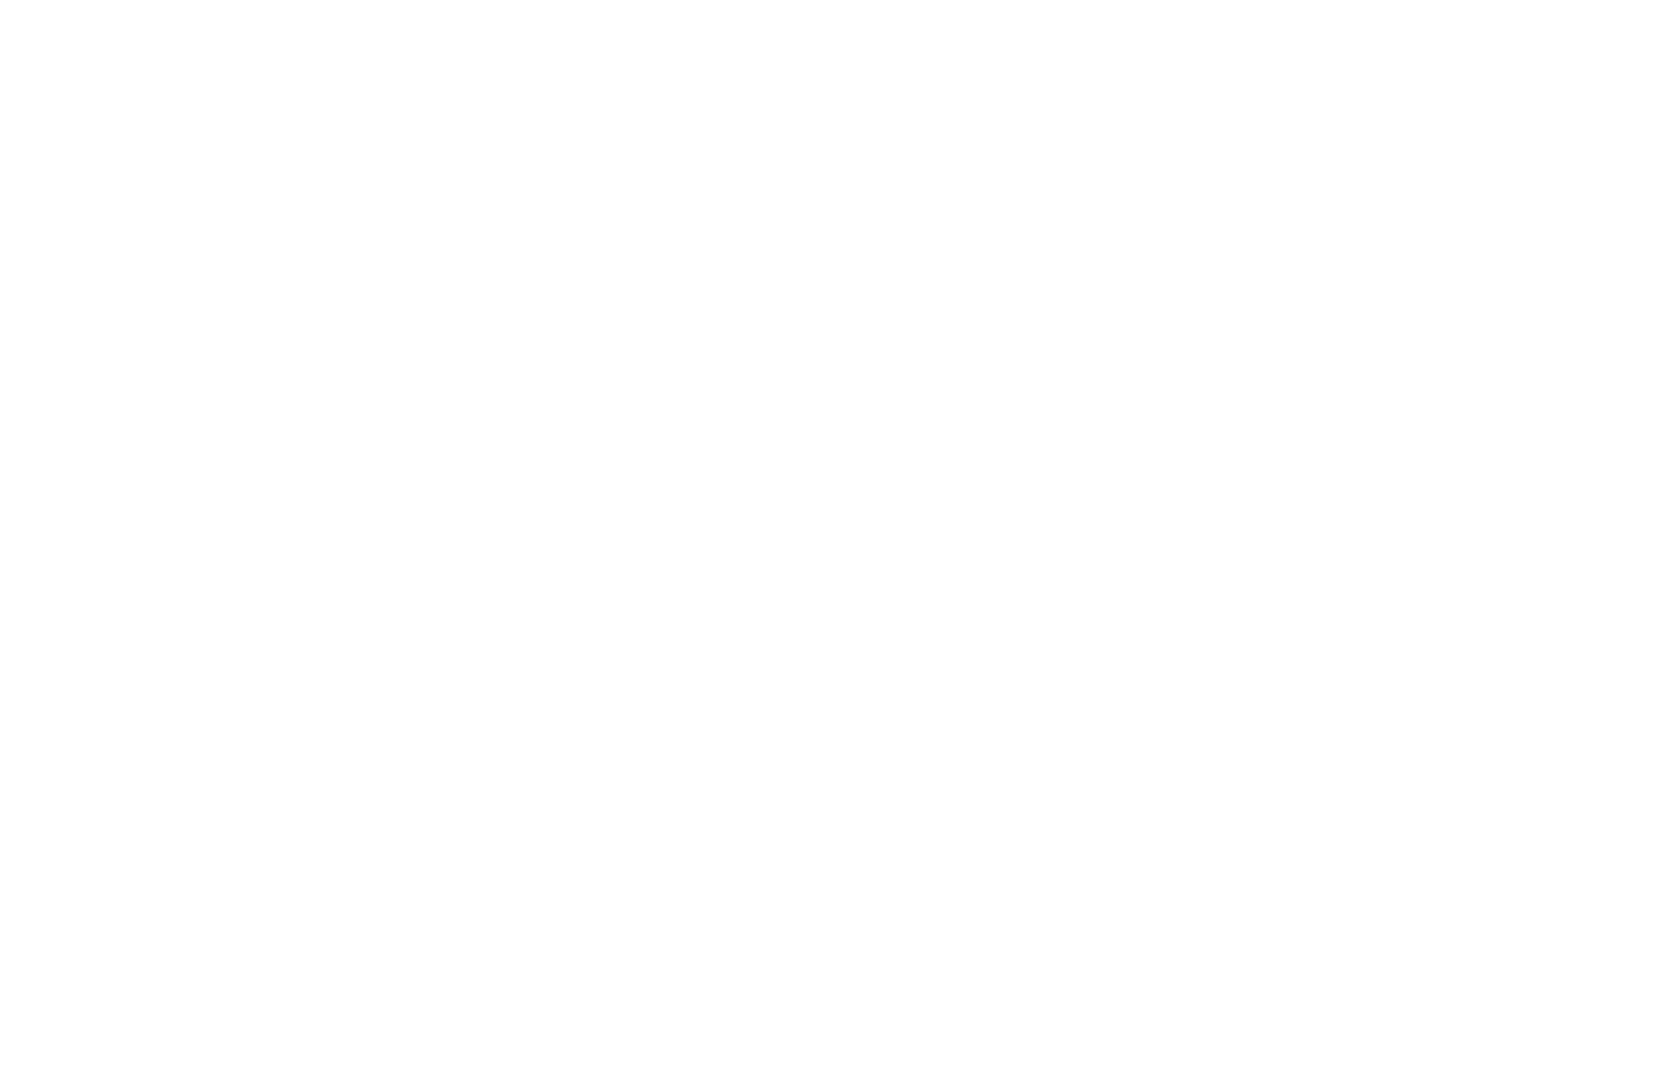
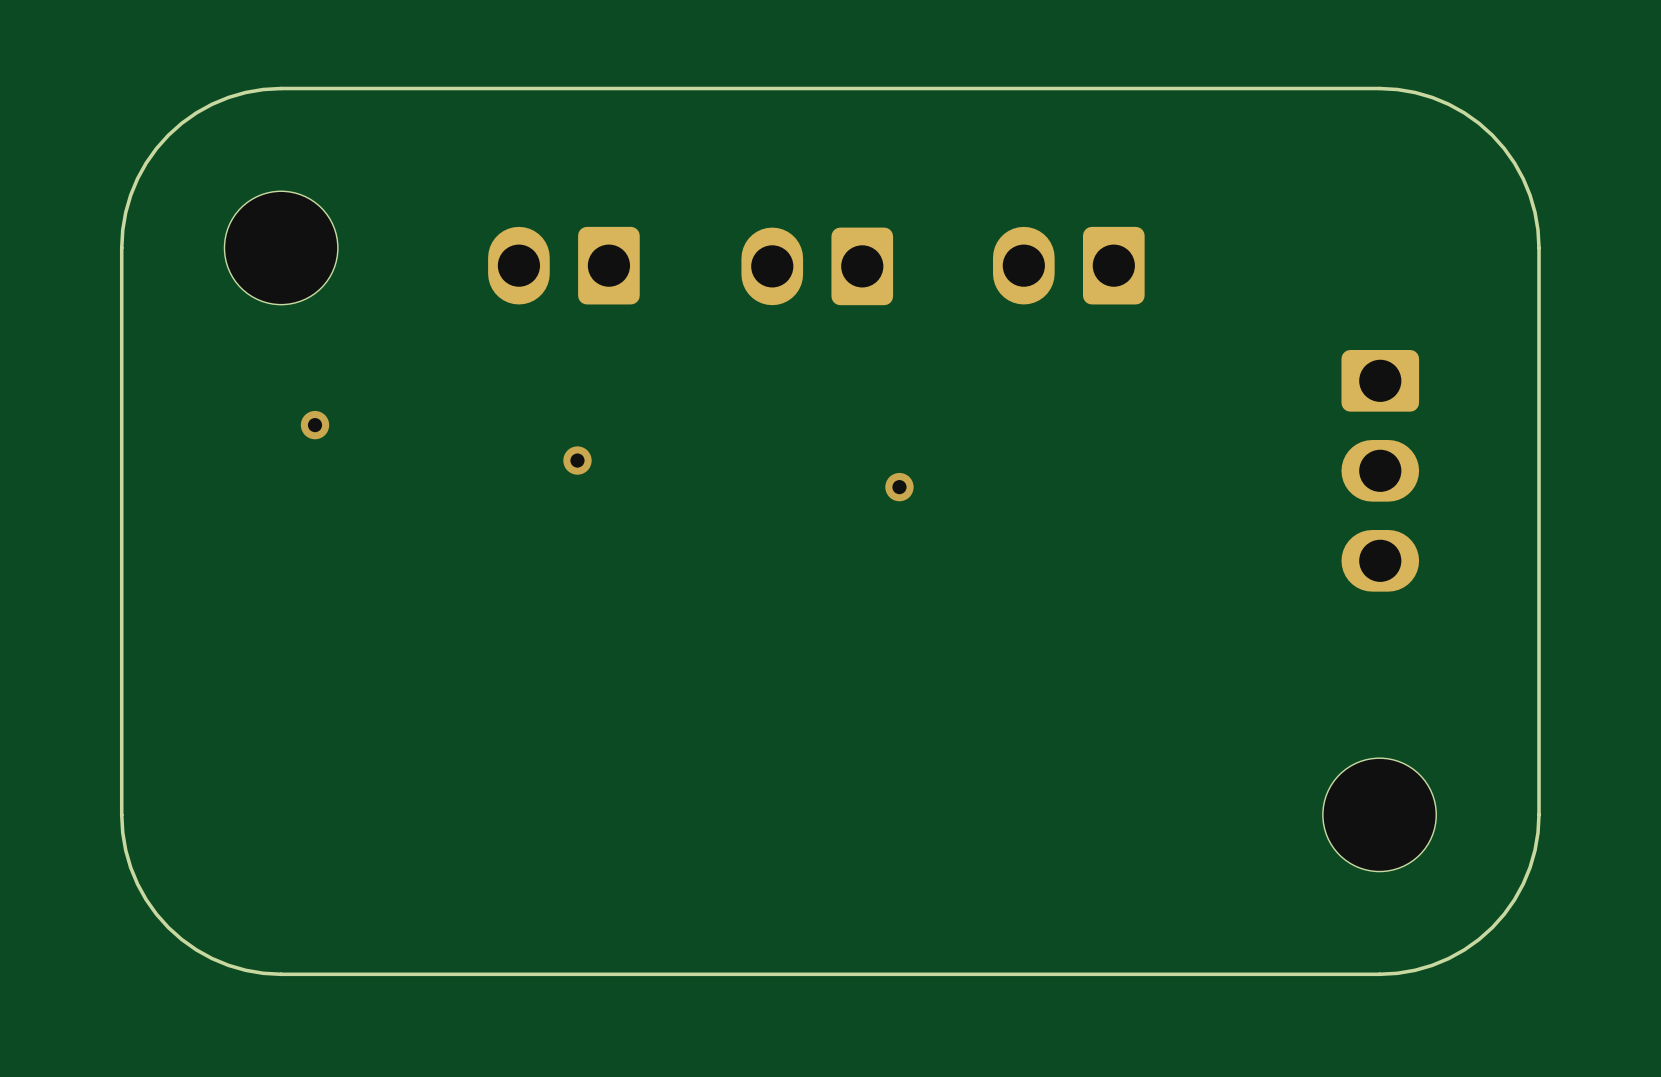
board edge: none -> (1379, 88) (281, 88) (263, 89) (228, 97) (196, 112) (168, 135) (146, 163) (130, 195) (122, 230) (121, 814) (125, 850) (130, 867) (146, 899) (168, 927) (196, 949) (228, 965) (245, 970) (281, 974) (1379, 974) (1415, 970) (1432, 965) (1464, 949) (1492, 927) (1514, 899) (1530, 867) (1538, 832) (1538, 230) (1530, 195) (1523, 178) (1504, 148) (1492, 135) (1464, 112) (1448, 104) (1415, 92) (1379, 88)
part: none -> (281, 247)
part: none -> (563, 265)
part: none -> (1068, 265)
part: none -> (817, 266)
via: none -> (315, 425)
via: none -> (577, 460)
part: none -> (1380, 470)
via: none -> (899, 487)
part: none -> (1379, 814)

